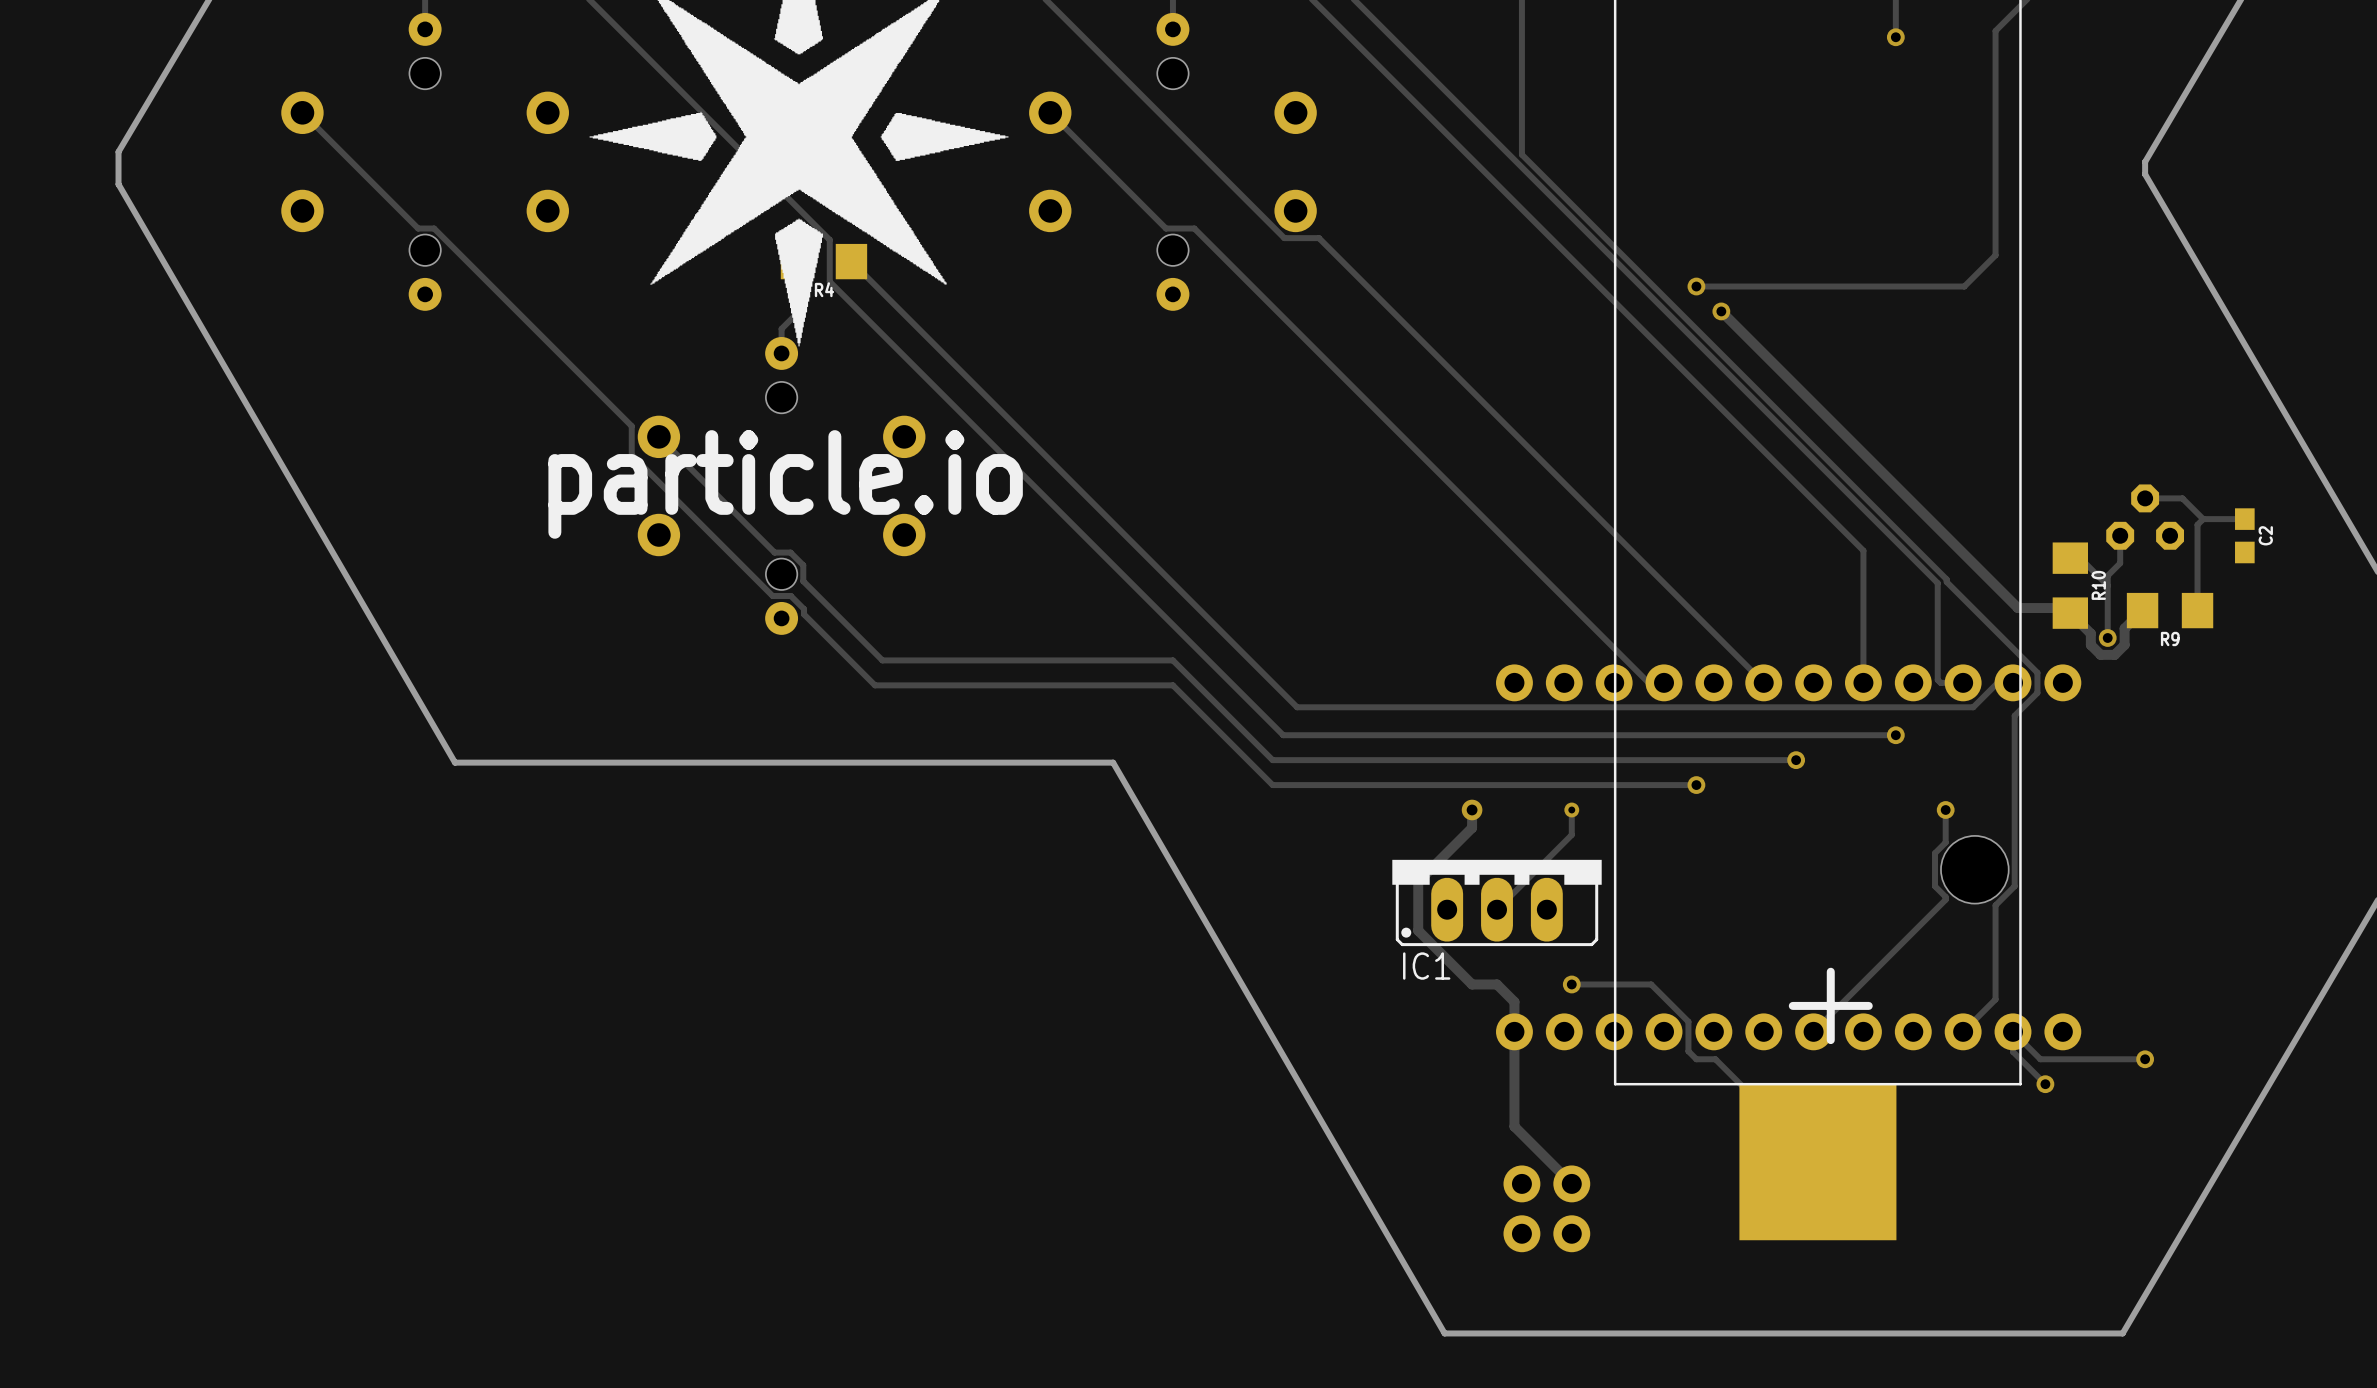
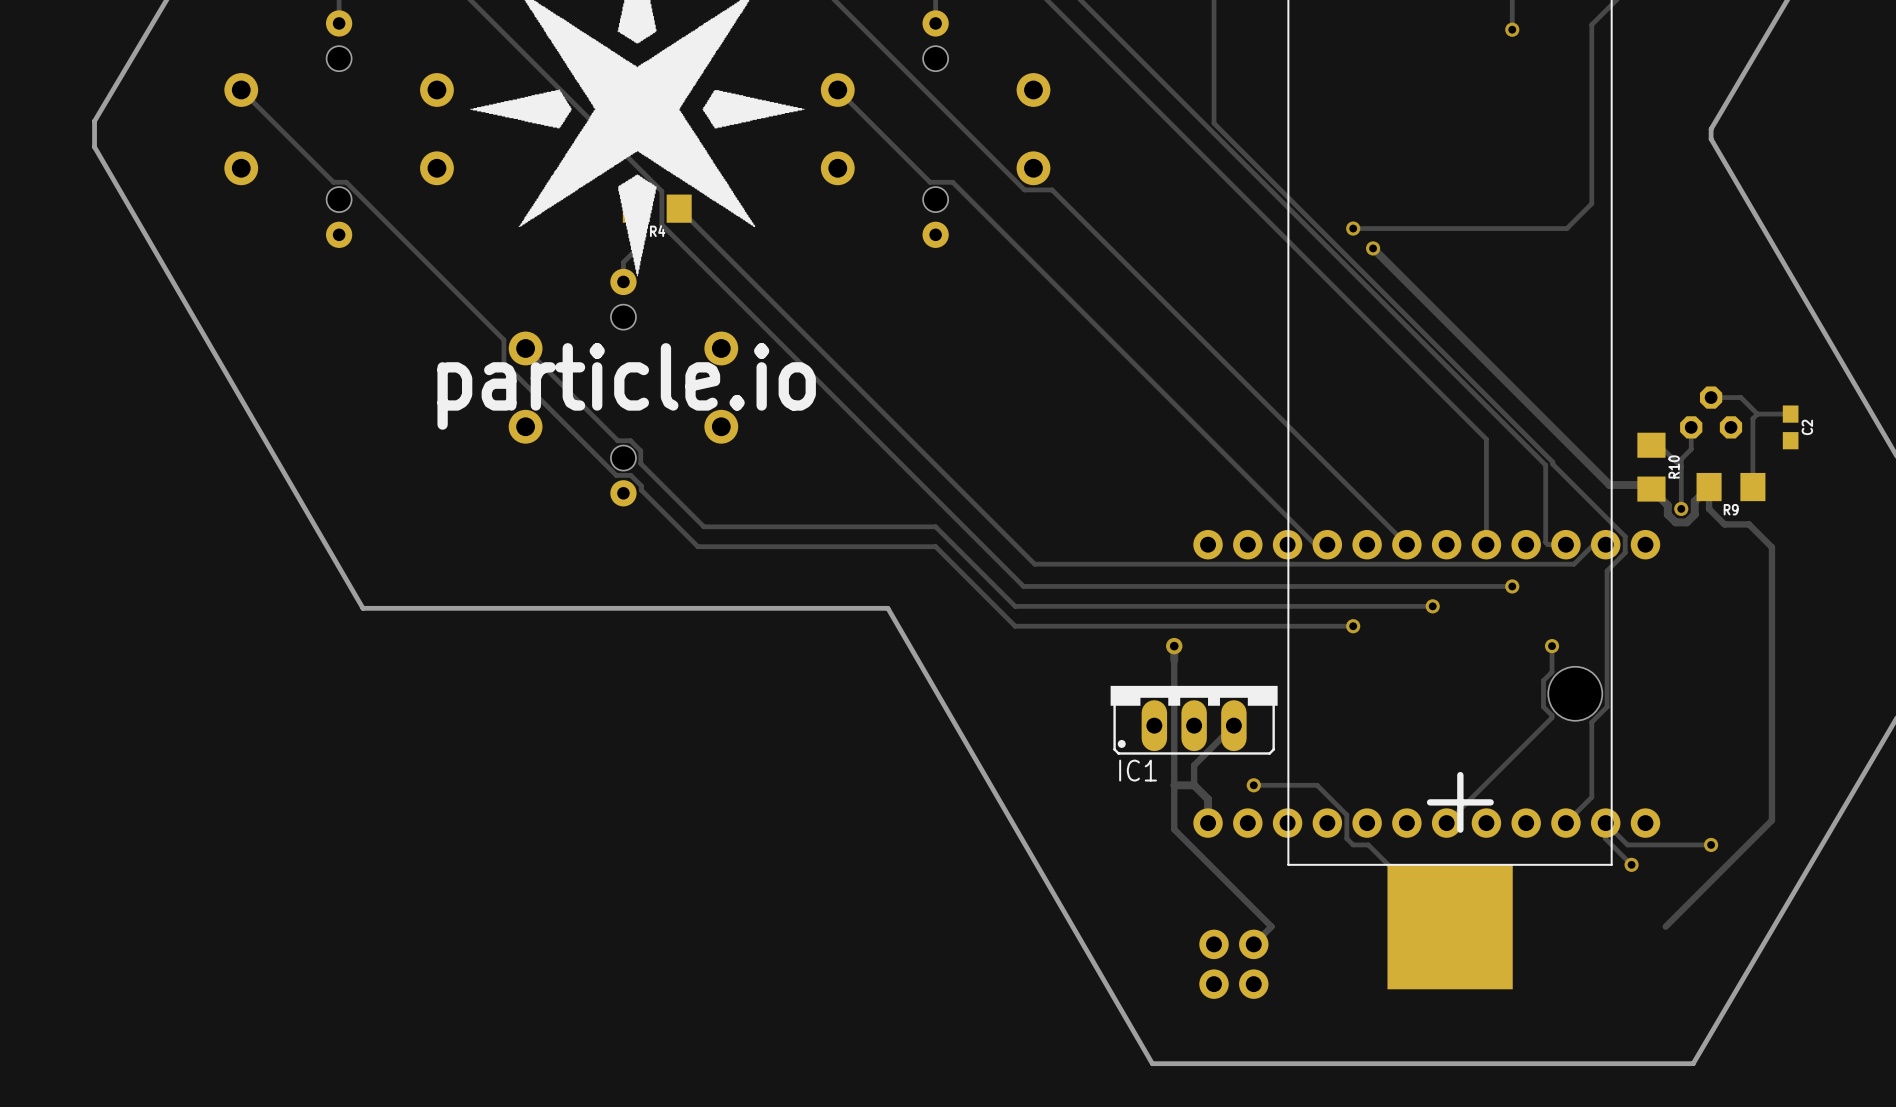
track: none -> (1709, 487) (1709, 508) (1724, 524) (1749, 524) (1771, 547) (1771, 820) (1665, 926)
track: (1571, 809) (1571, 834) (1497, 909) -> none
via: (1571, 809) -> none
track: (1472, 827) (1418, 881) (1418, 930) (1472, 984) -> none
track: none -> (1233, 725) (1194, 765) (1194, 785)
track: (1514, 1031) (1514, 1126) (1571, 1183) -> (1174, 660) (1174, 829) (1271, 926) (1253, 944)

